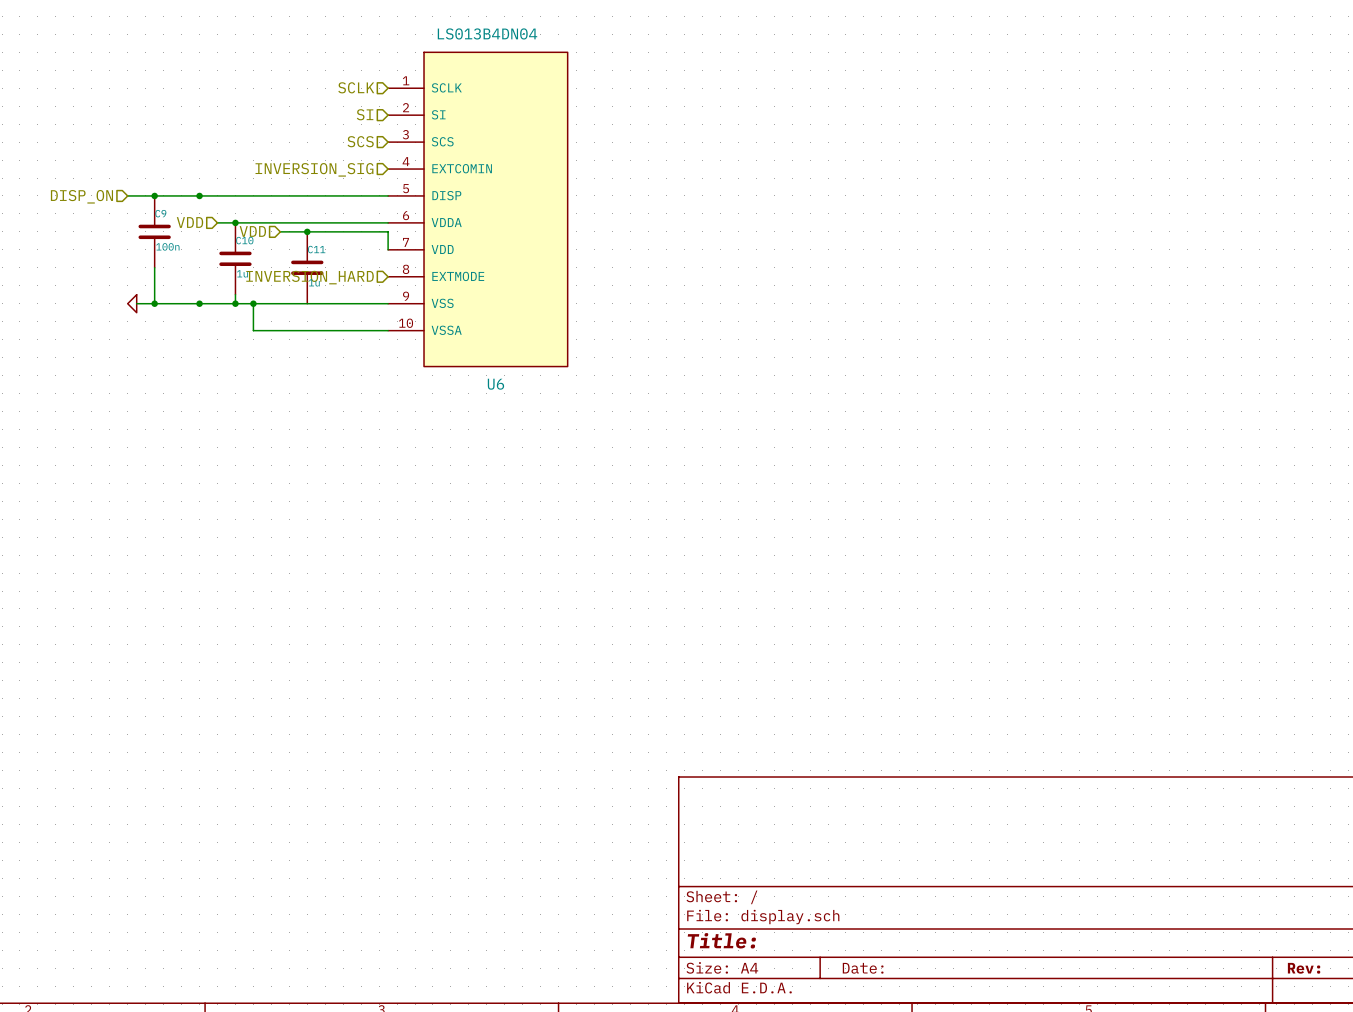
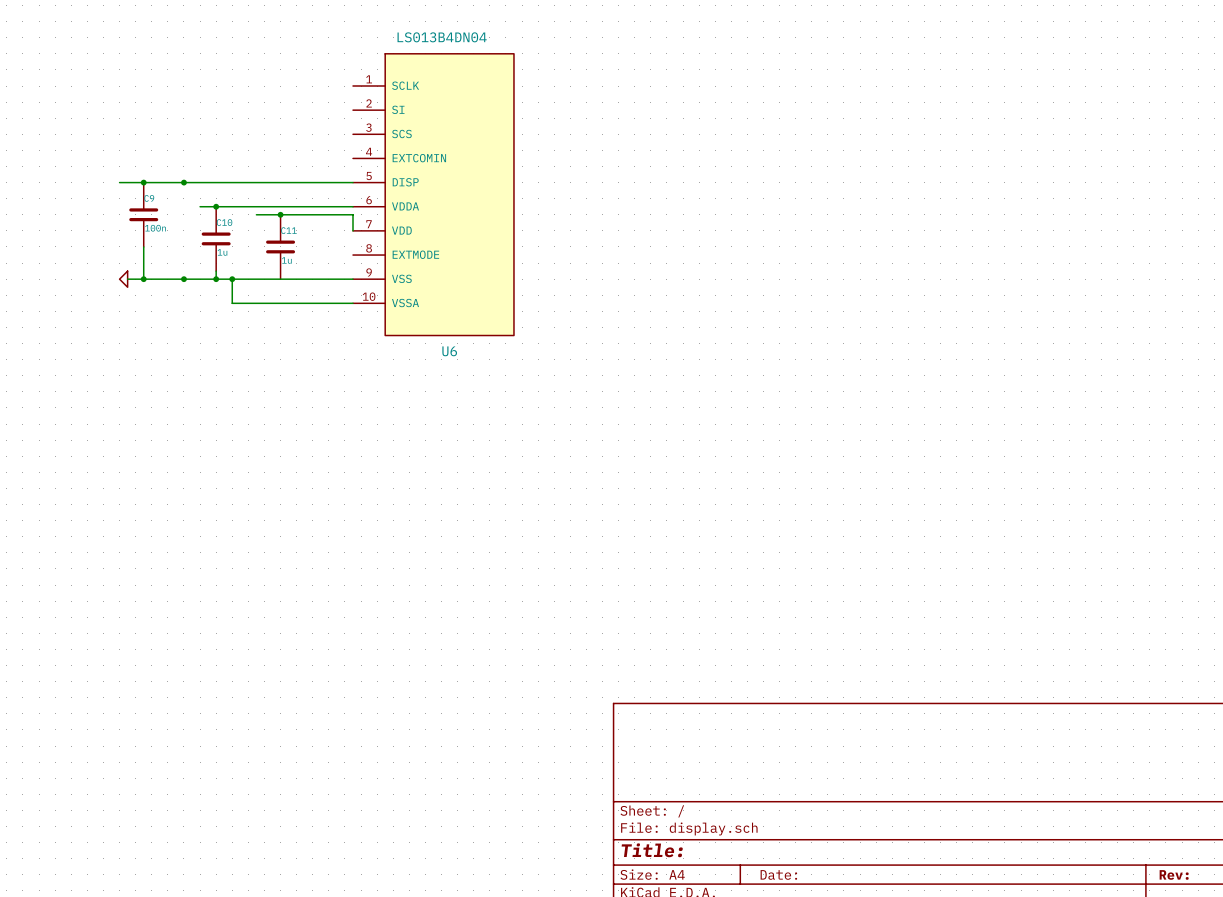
hierarchical label: SCLK (356, 87) -> none
hierarchical label: SI (365, 114) -> none
hierarchical label: SCS (360, 141) -> none
hierarchical label: INVERSION_SIG (314, 169) -> none
hierarchical label: DISP_ON (81, 196) -> none
hierarchical label: VDD (189, 222) -> none
hierarchical label: VDD (252, 231) -> none
hierarchical label: INVERSION_HARD (310, 277) -> none

